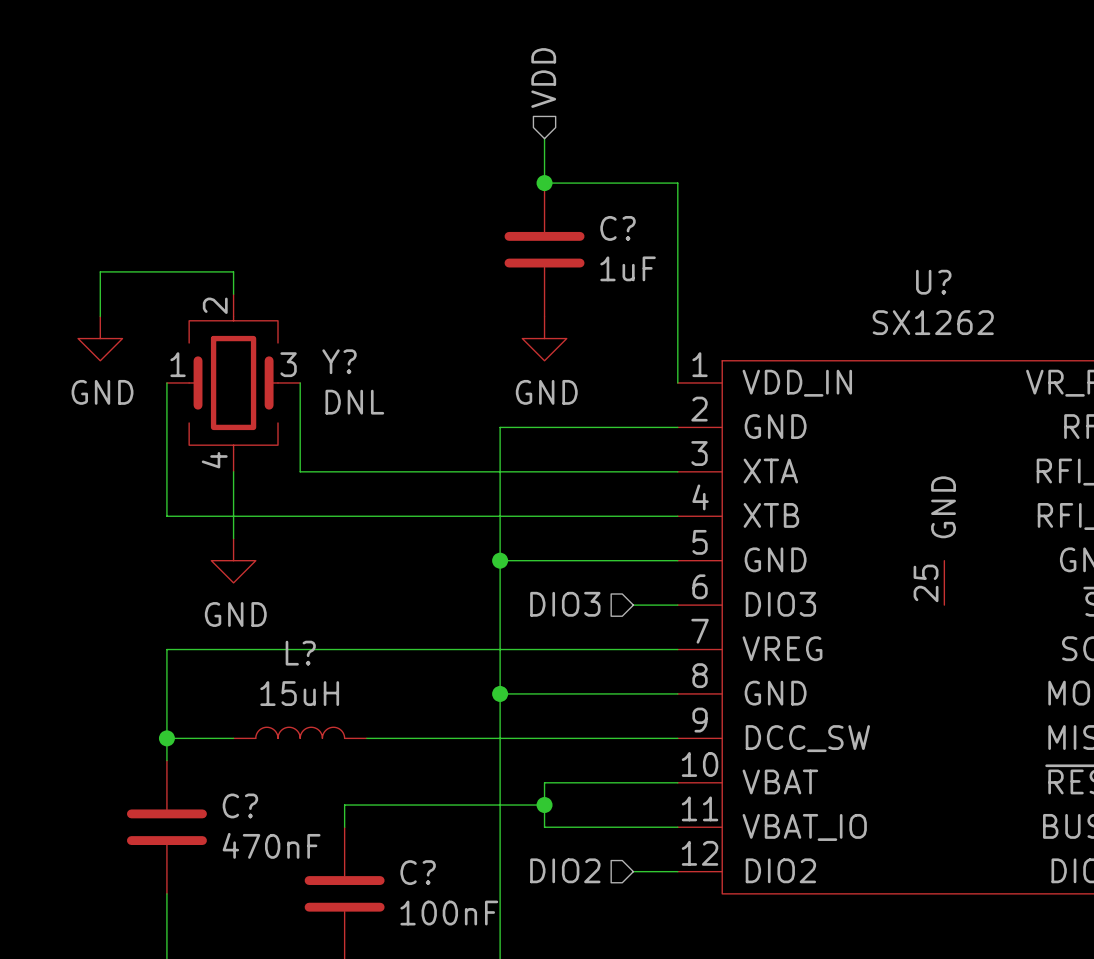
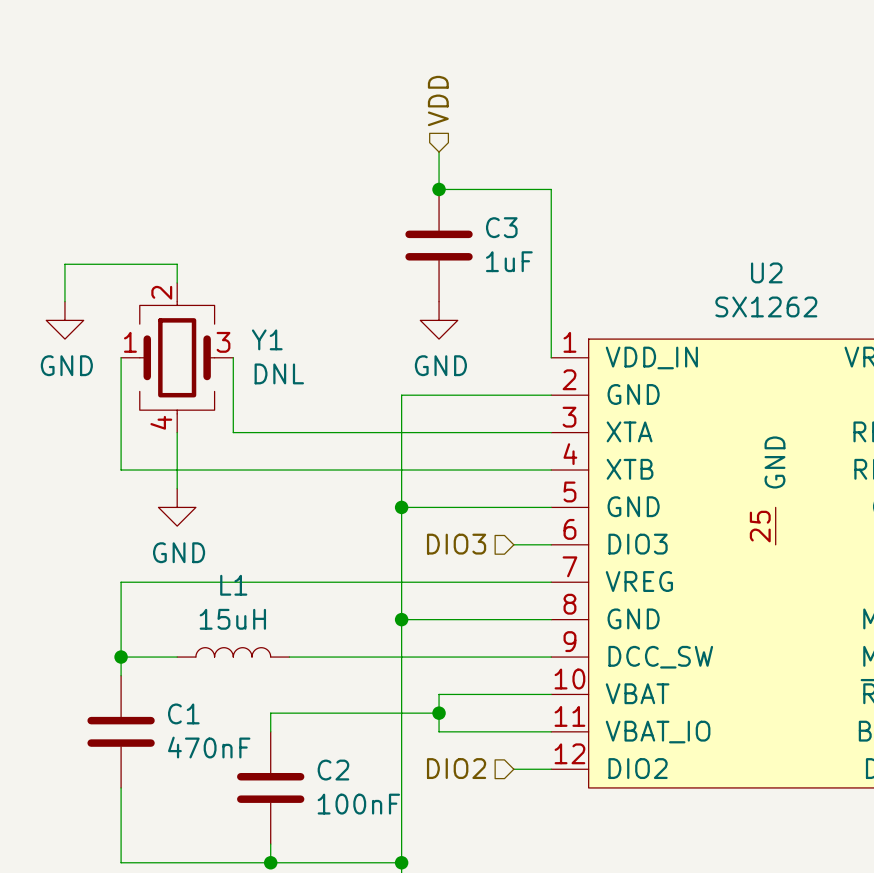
C? name: C? (618, 228) -> C3 (501, 227)
U? name: U? (933, 282) -> U2 (766, 272)
Y? name: Y? (339, 361) -> Y1 (267, 339)
L? name: L? (300, 653) -> L1 (233, 585)
C? name: C? (240, 805) -> C1 (183, 713)
C? name: C? (418, 872) -> C2 (333, 770)

